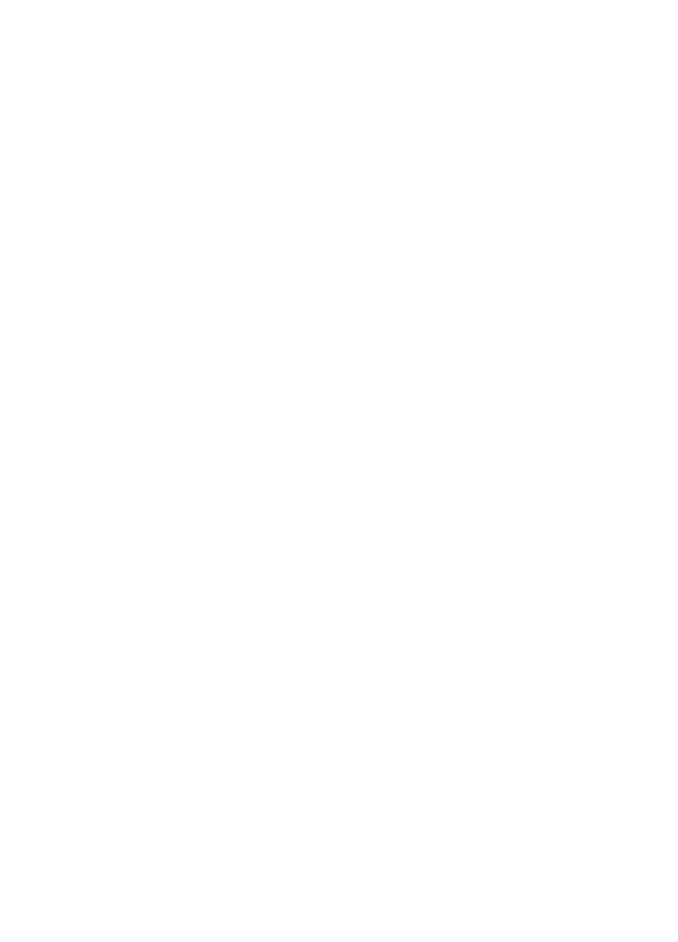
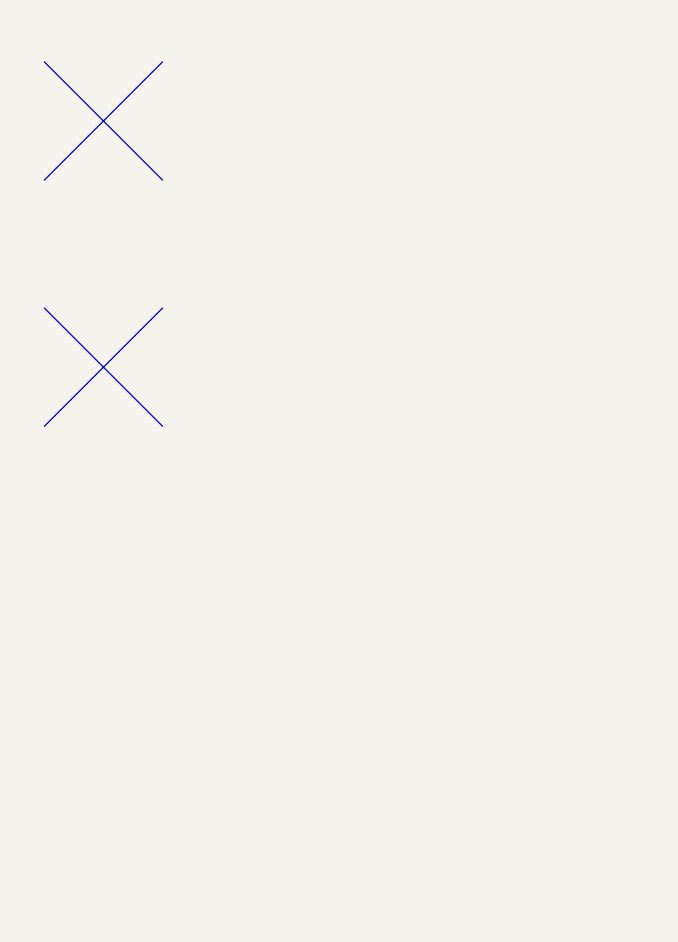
no-connect mark: none -> (103, 121)
no-connect mark: none -> (103, 367)

